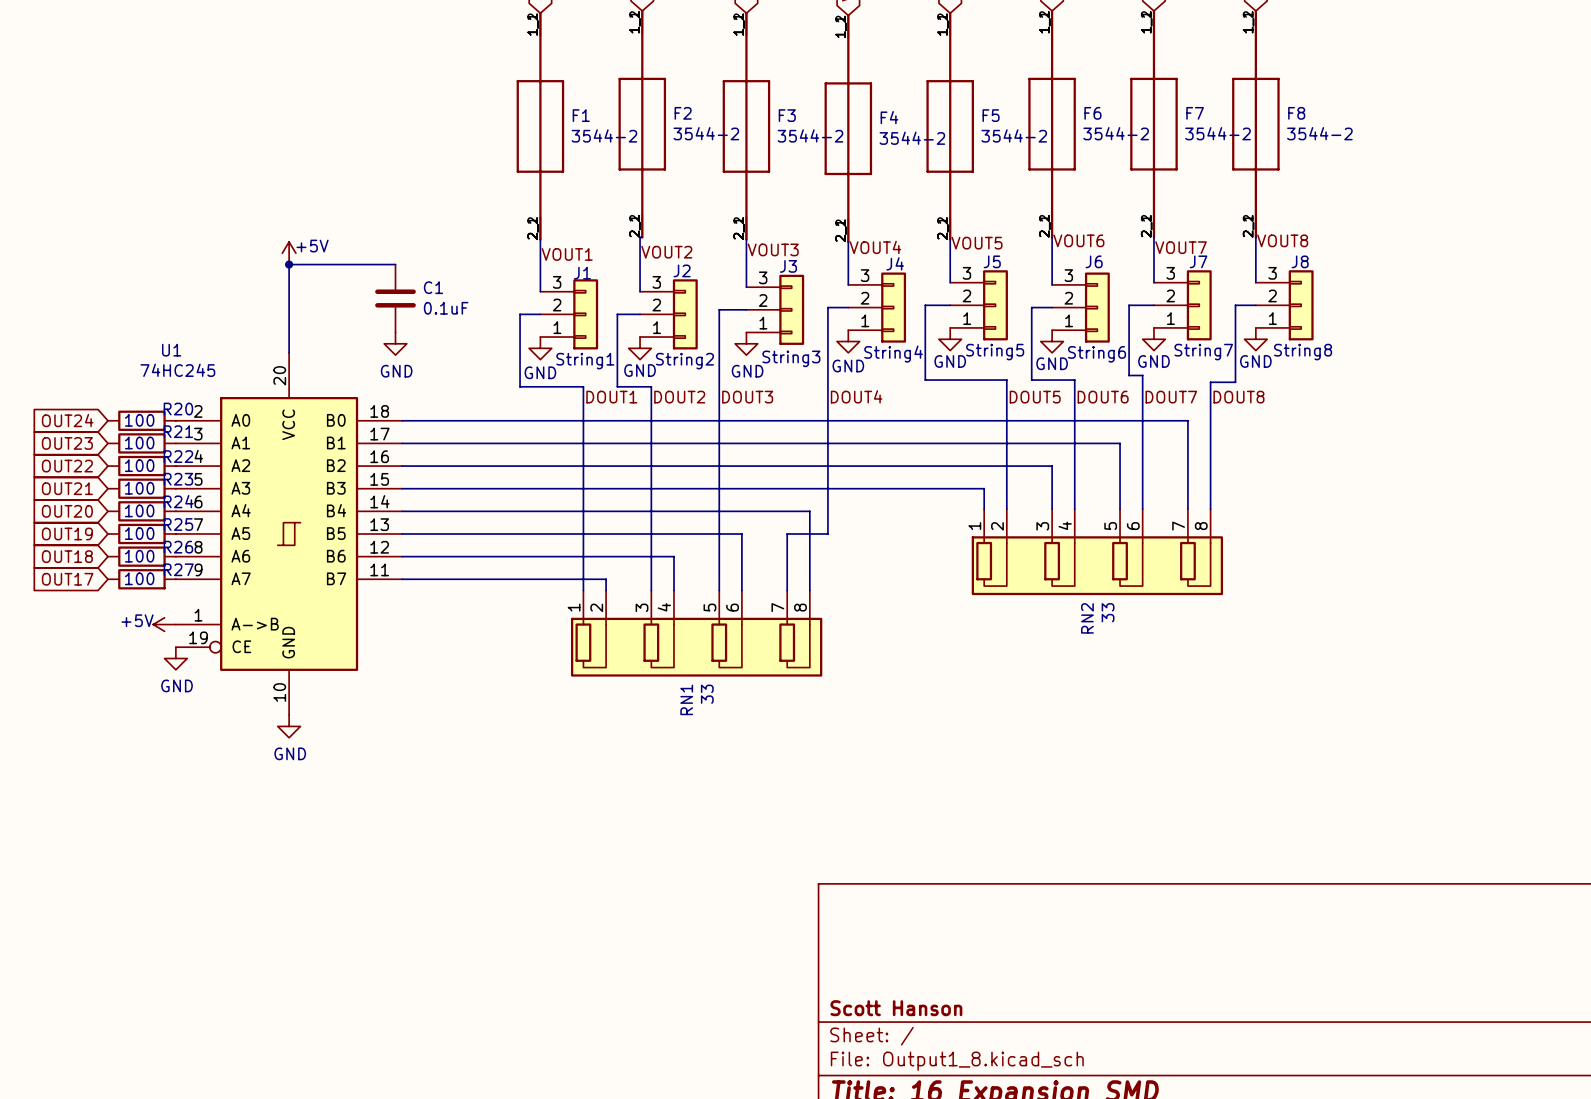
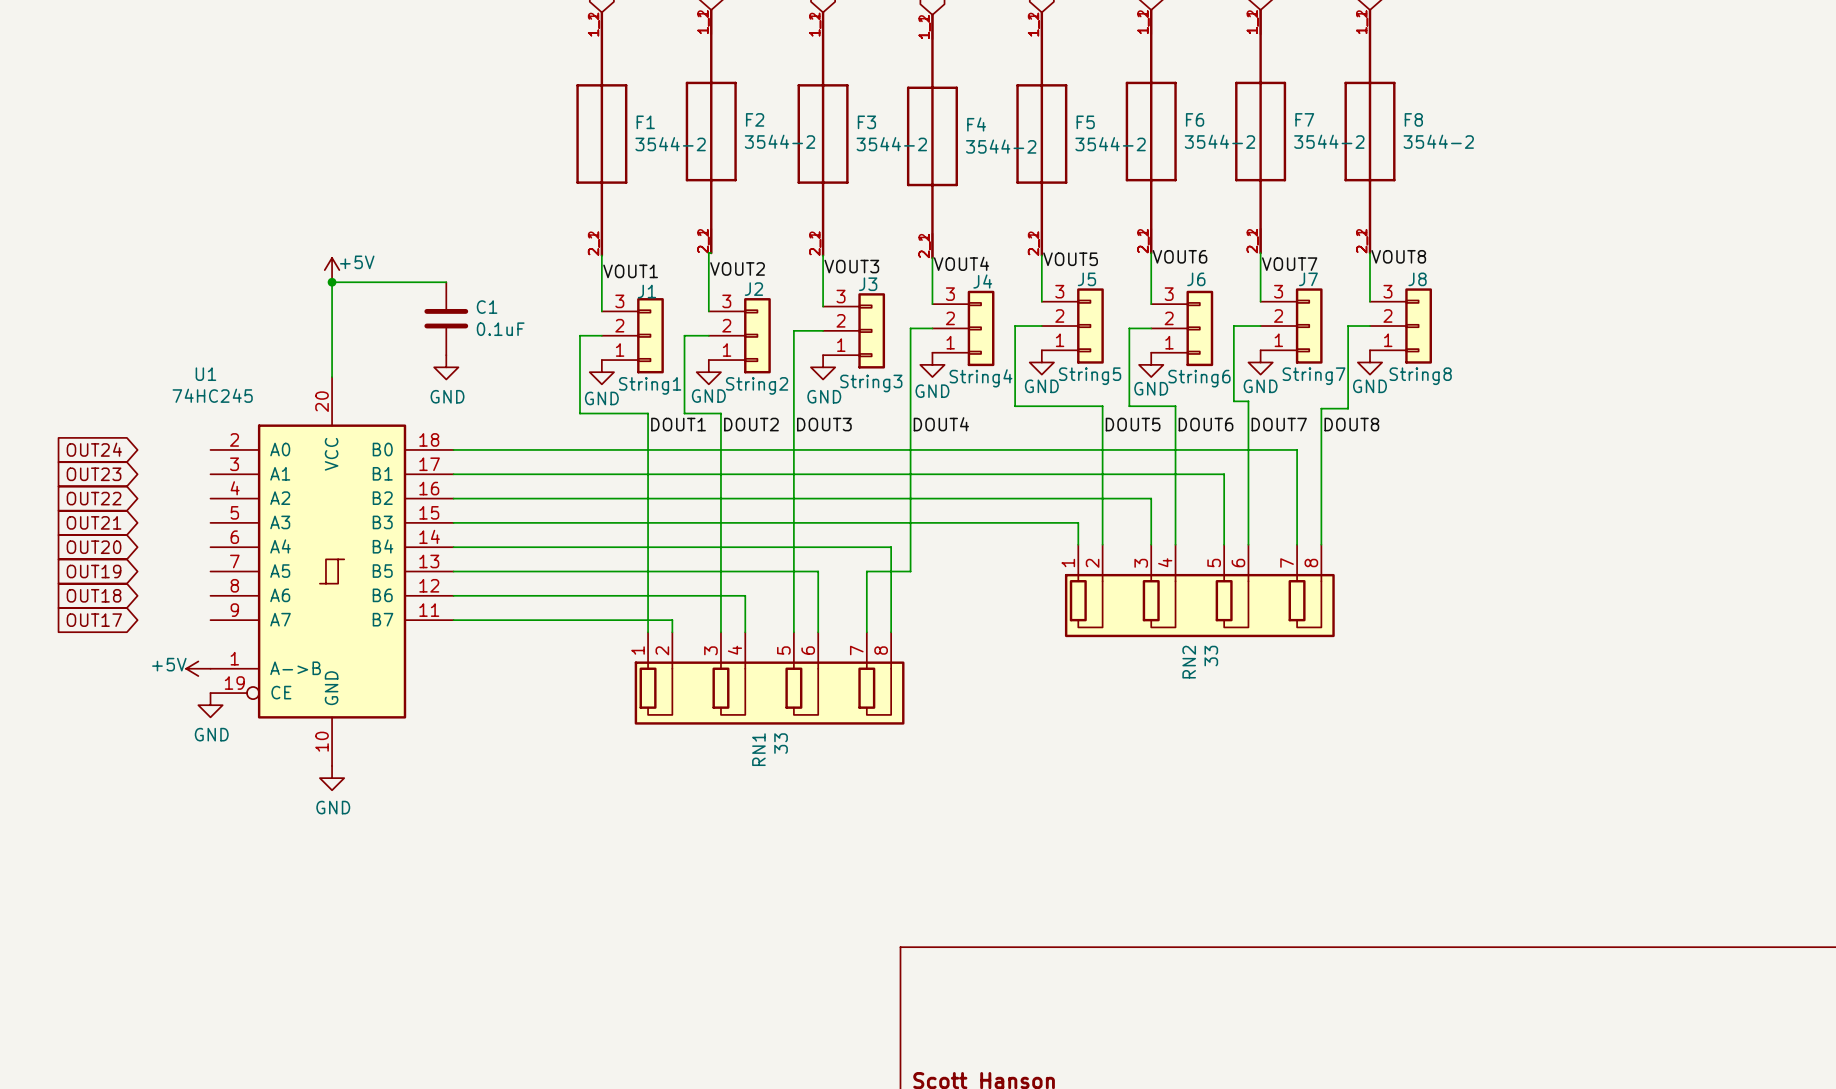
R20: 100 (141, 420) -> none
R21: 100 (141, 443) -> none
R22: 100 (141, 466) -> none
R23: 100 (141, 488) -> none
R24: 100 (141, 511) -> none
R25: 100 (141, 533) -> none
R26: 100 (141, 556) -> none
R27: 100 (141, 579) -> none

